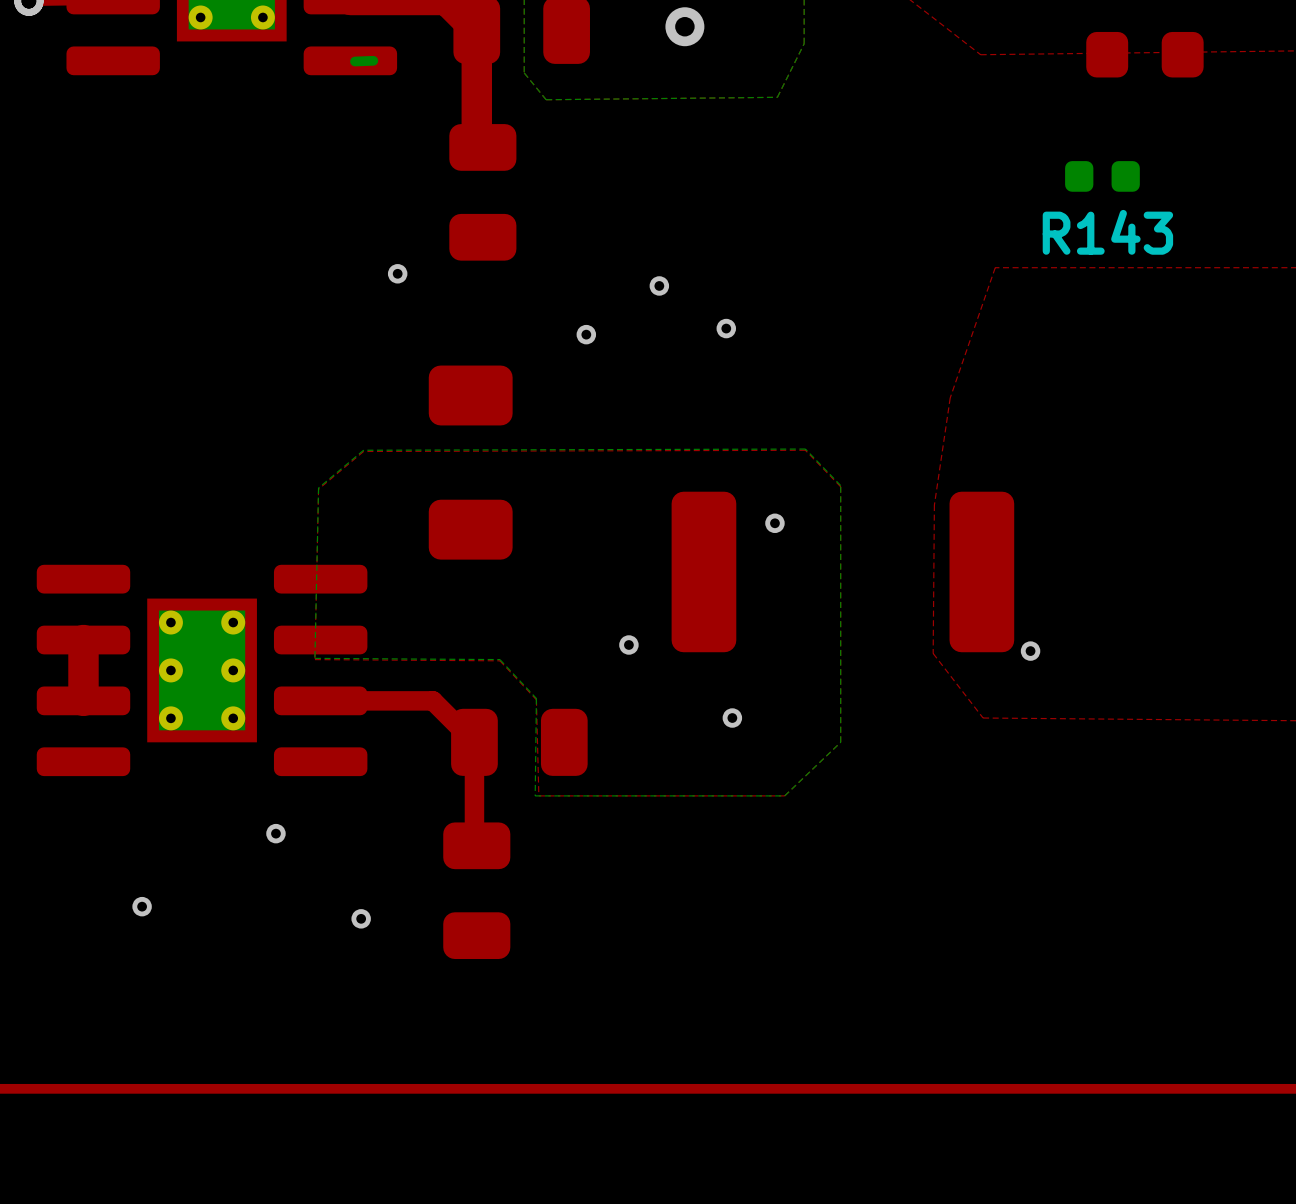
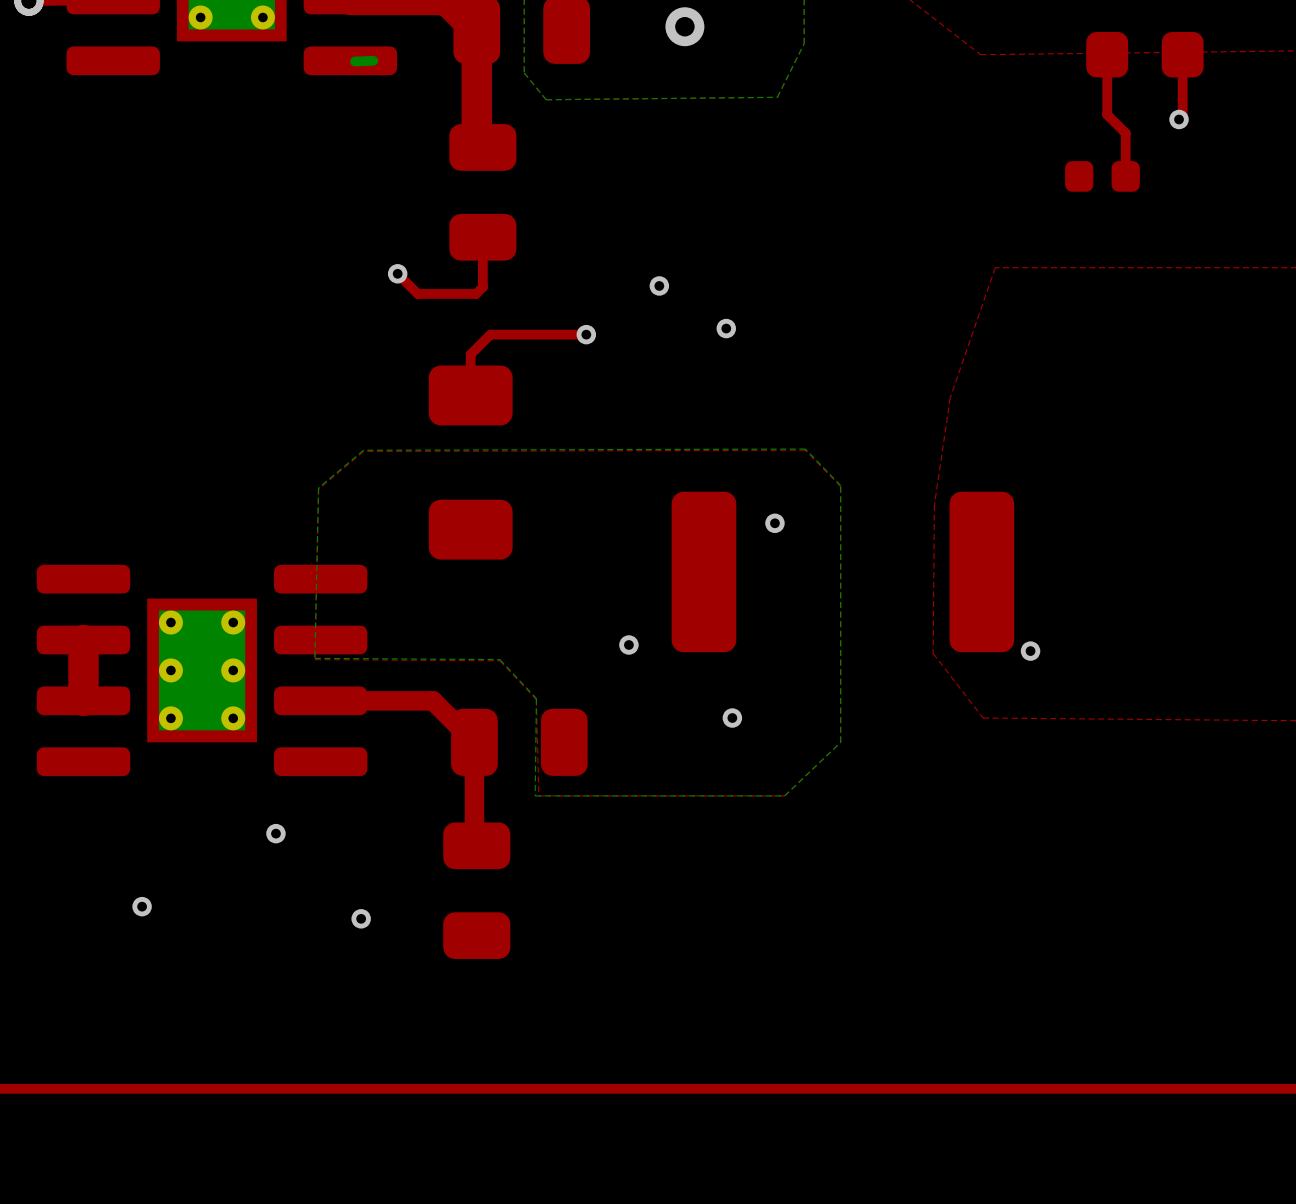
top track: none -> (1107, 54) (1107, 114) (1125, 133) (1125, 176)
top track: none -> (1182, 54) (1182, 115) (1179, 119)
via: none -> (1179, 119)
R143 side: bottom (1102, 176) -> top (1102, 176)
top track: none -> (482, 237) (482, 287) (476, 293) (417, 293) (397, 273)
top track: none -> (586, 334) (490, 334) (470, 354) (470, 395)

